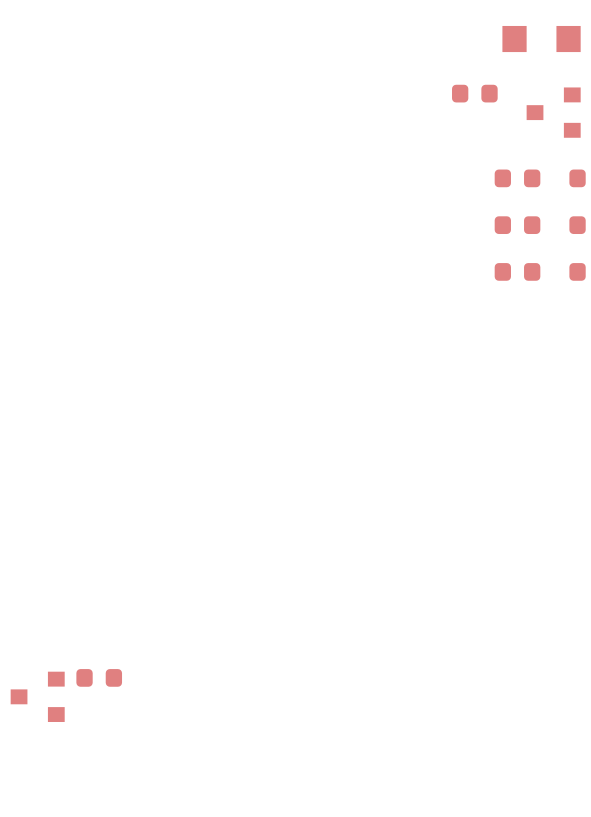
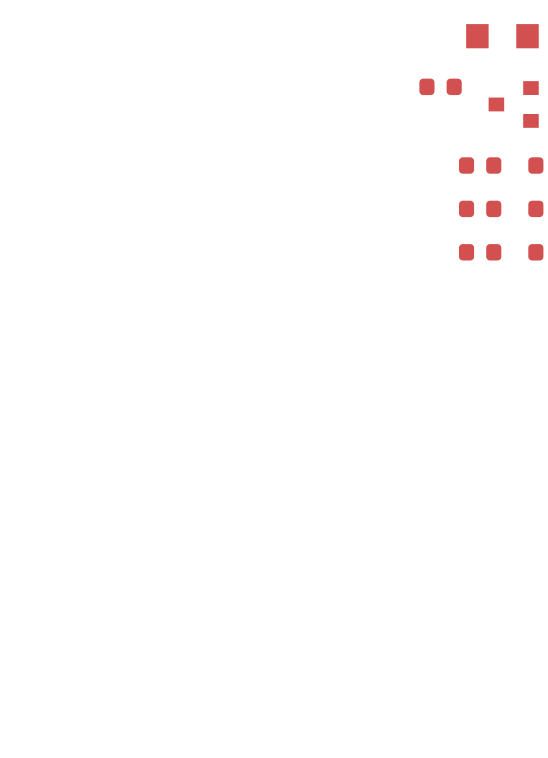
part: (99, 677) -> none
part: (37, 696) -> none

